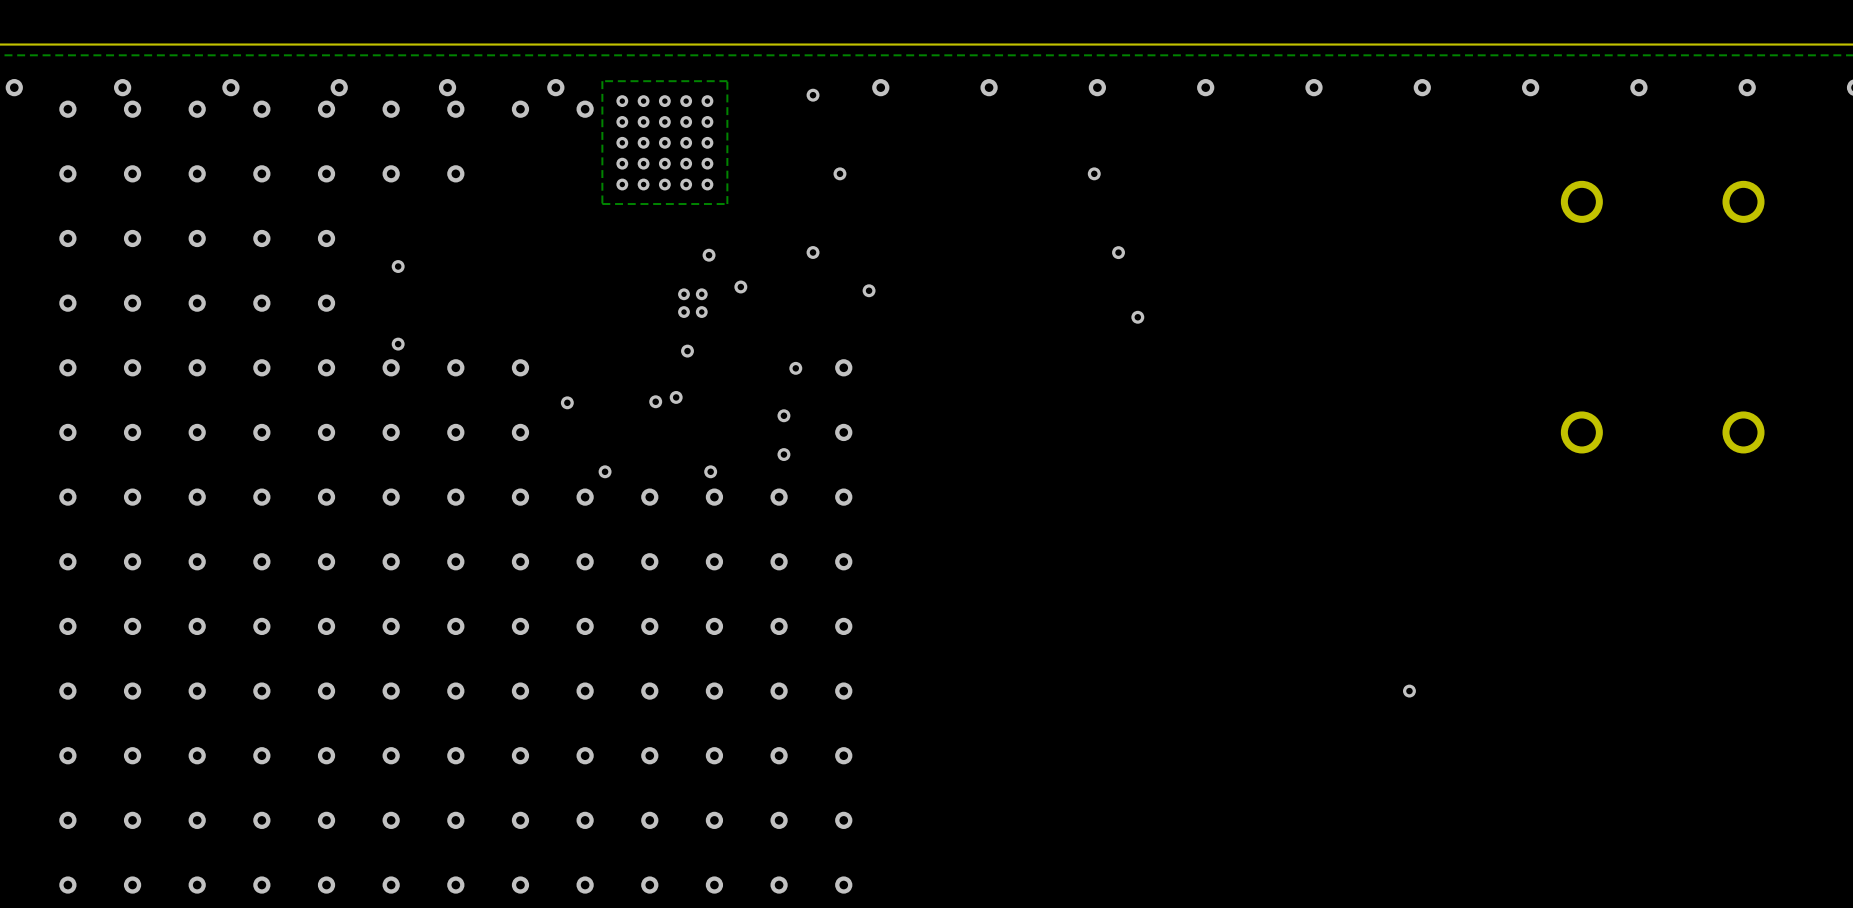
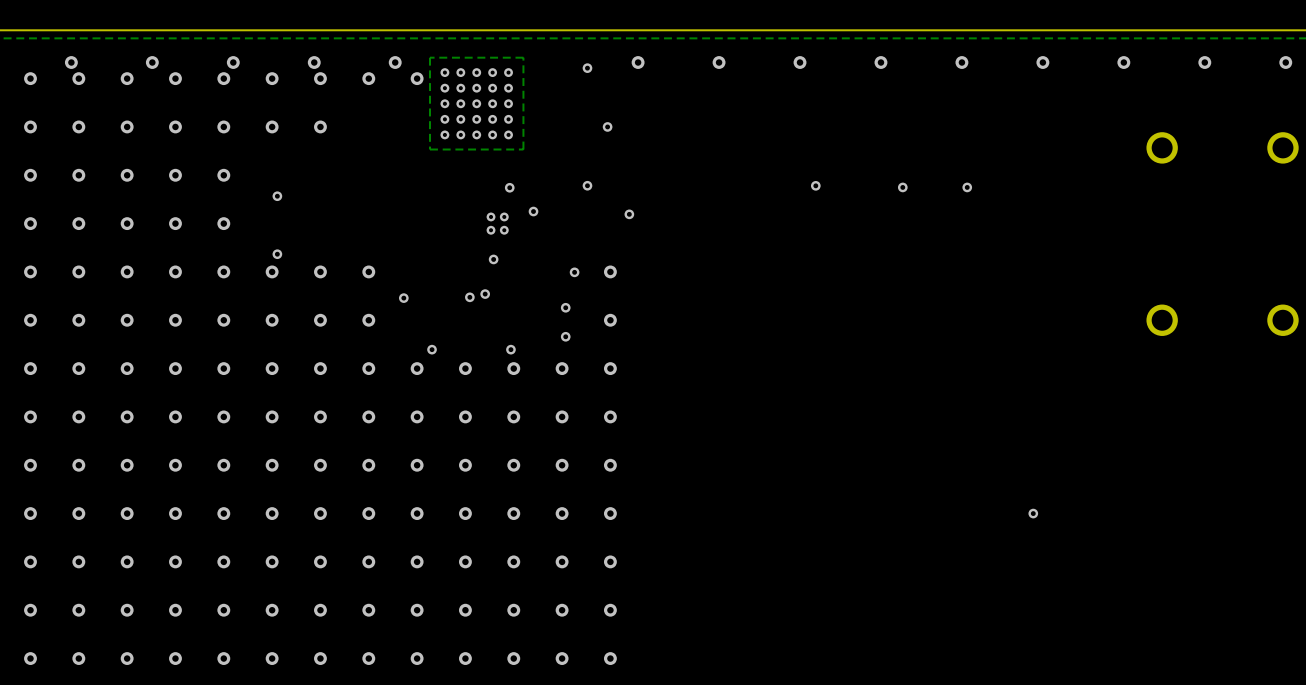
via: (1094, 173) -> none
via: none -> (902, 187)
via: none -> (967, 187)
via: (1137, 317) -> none

